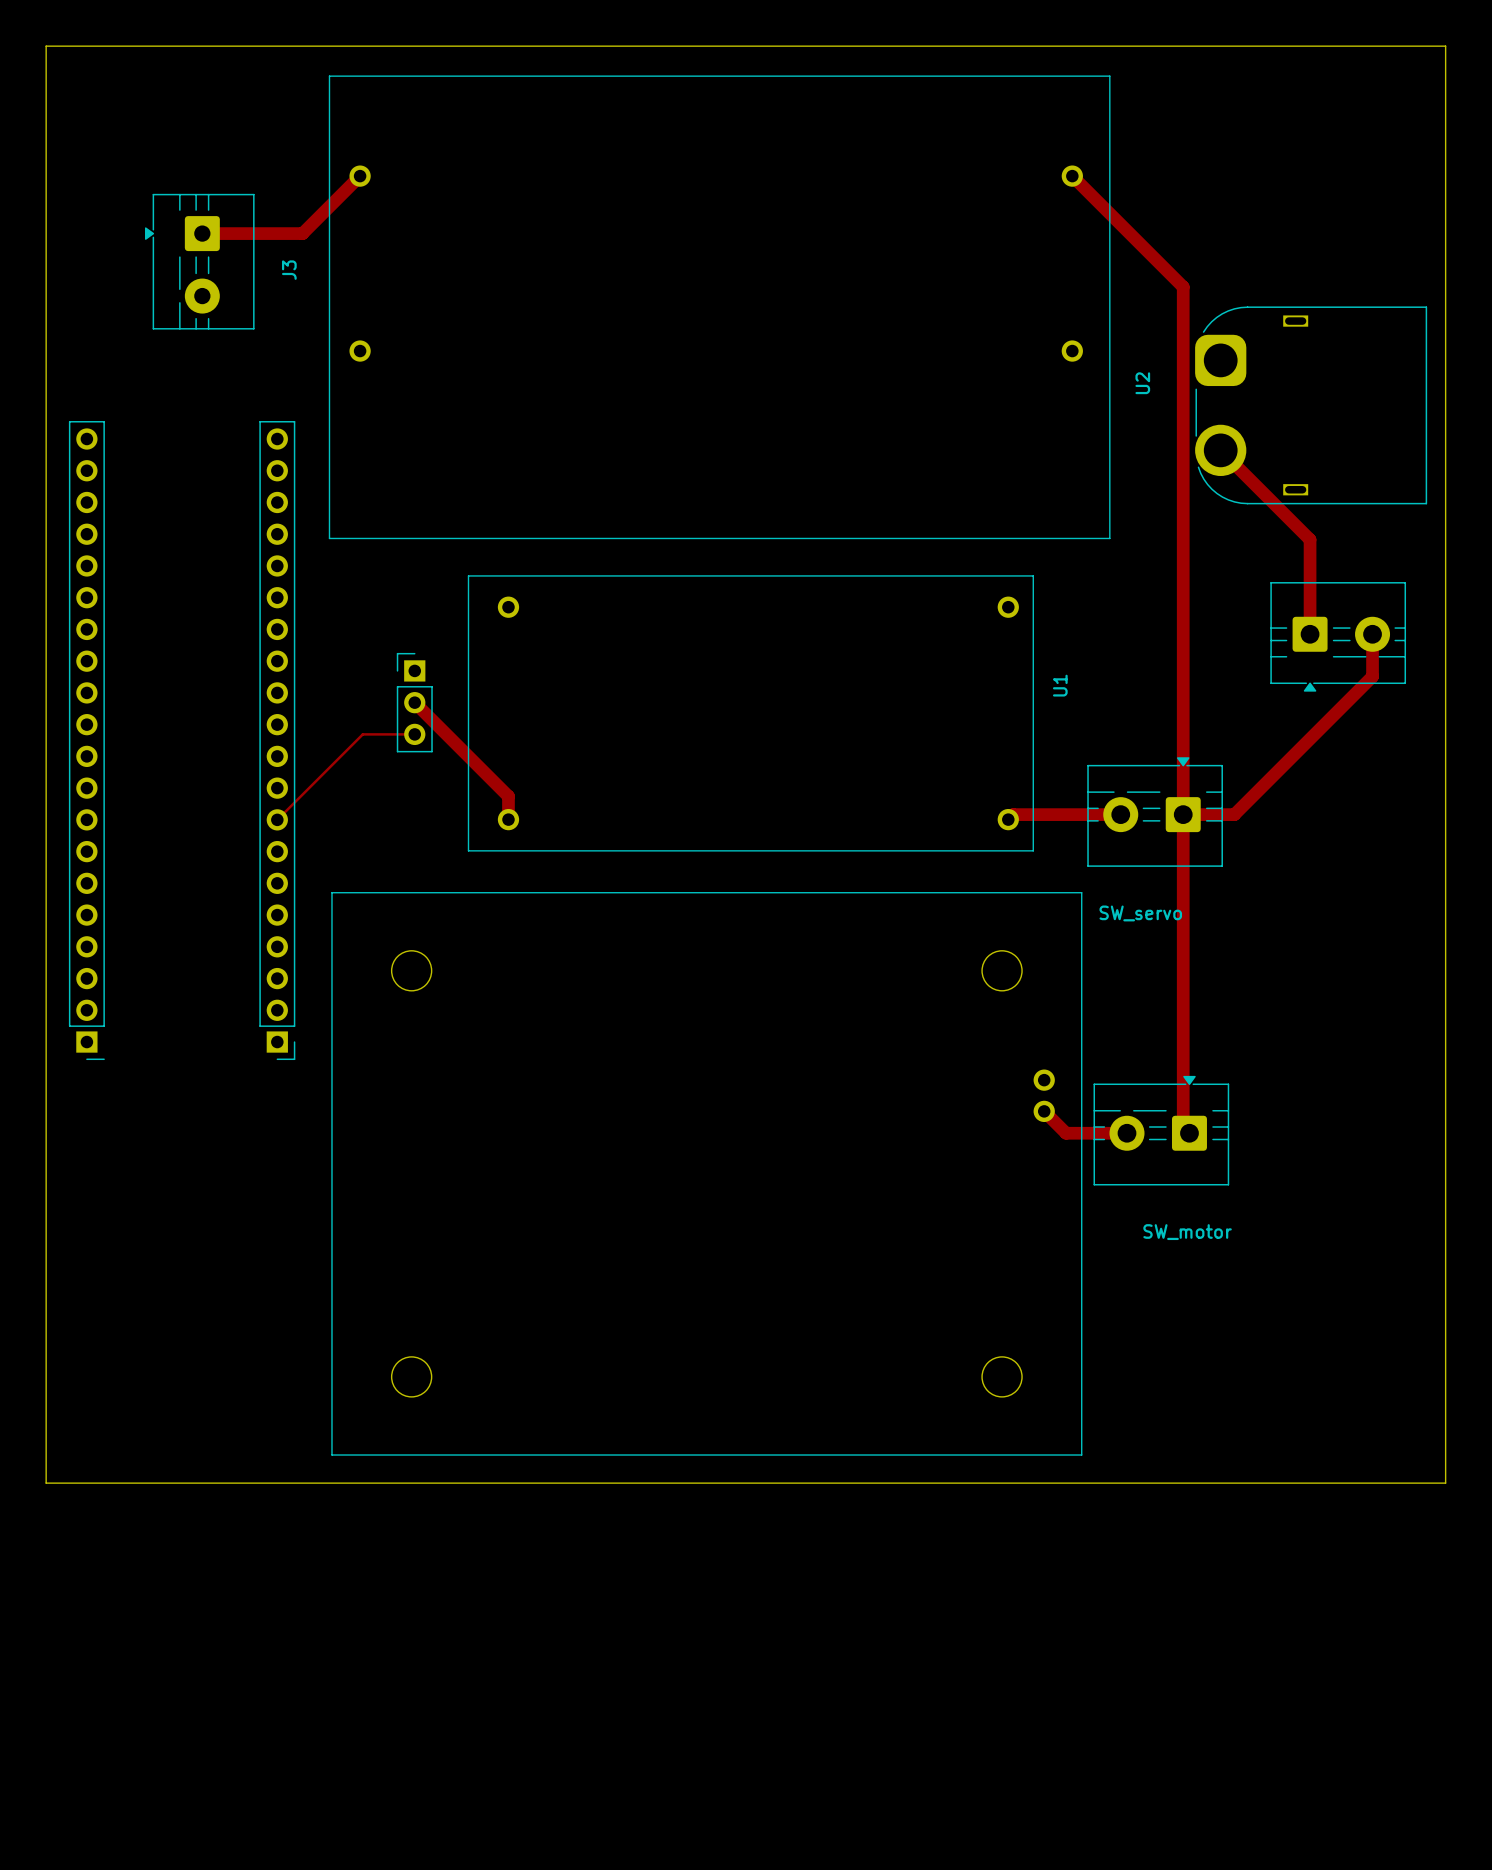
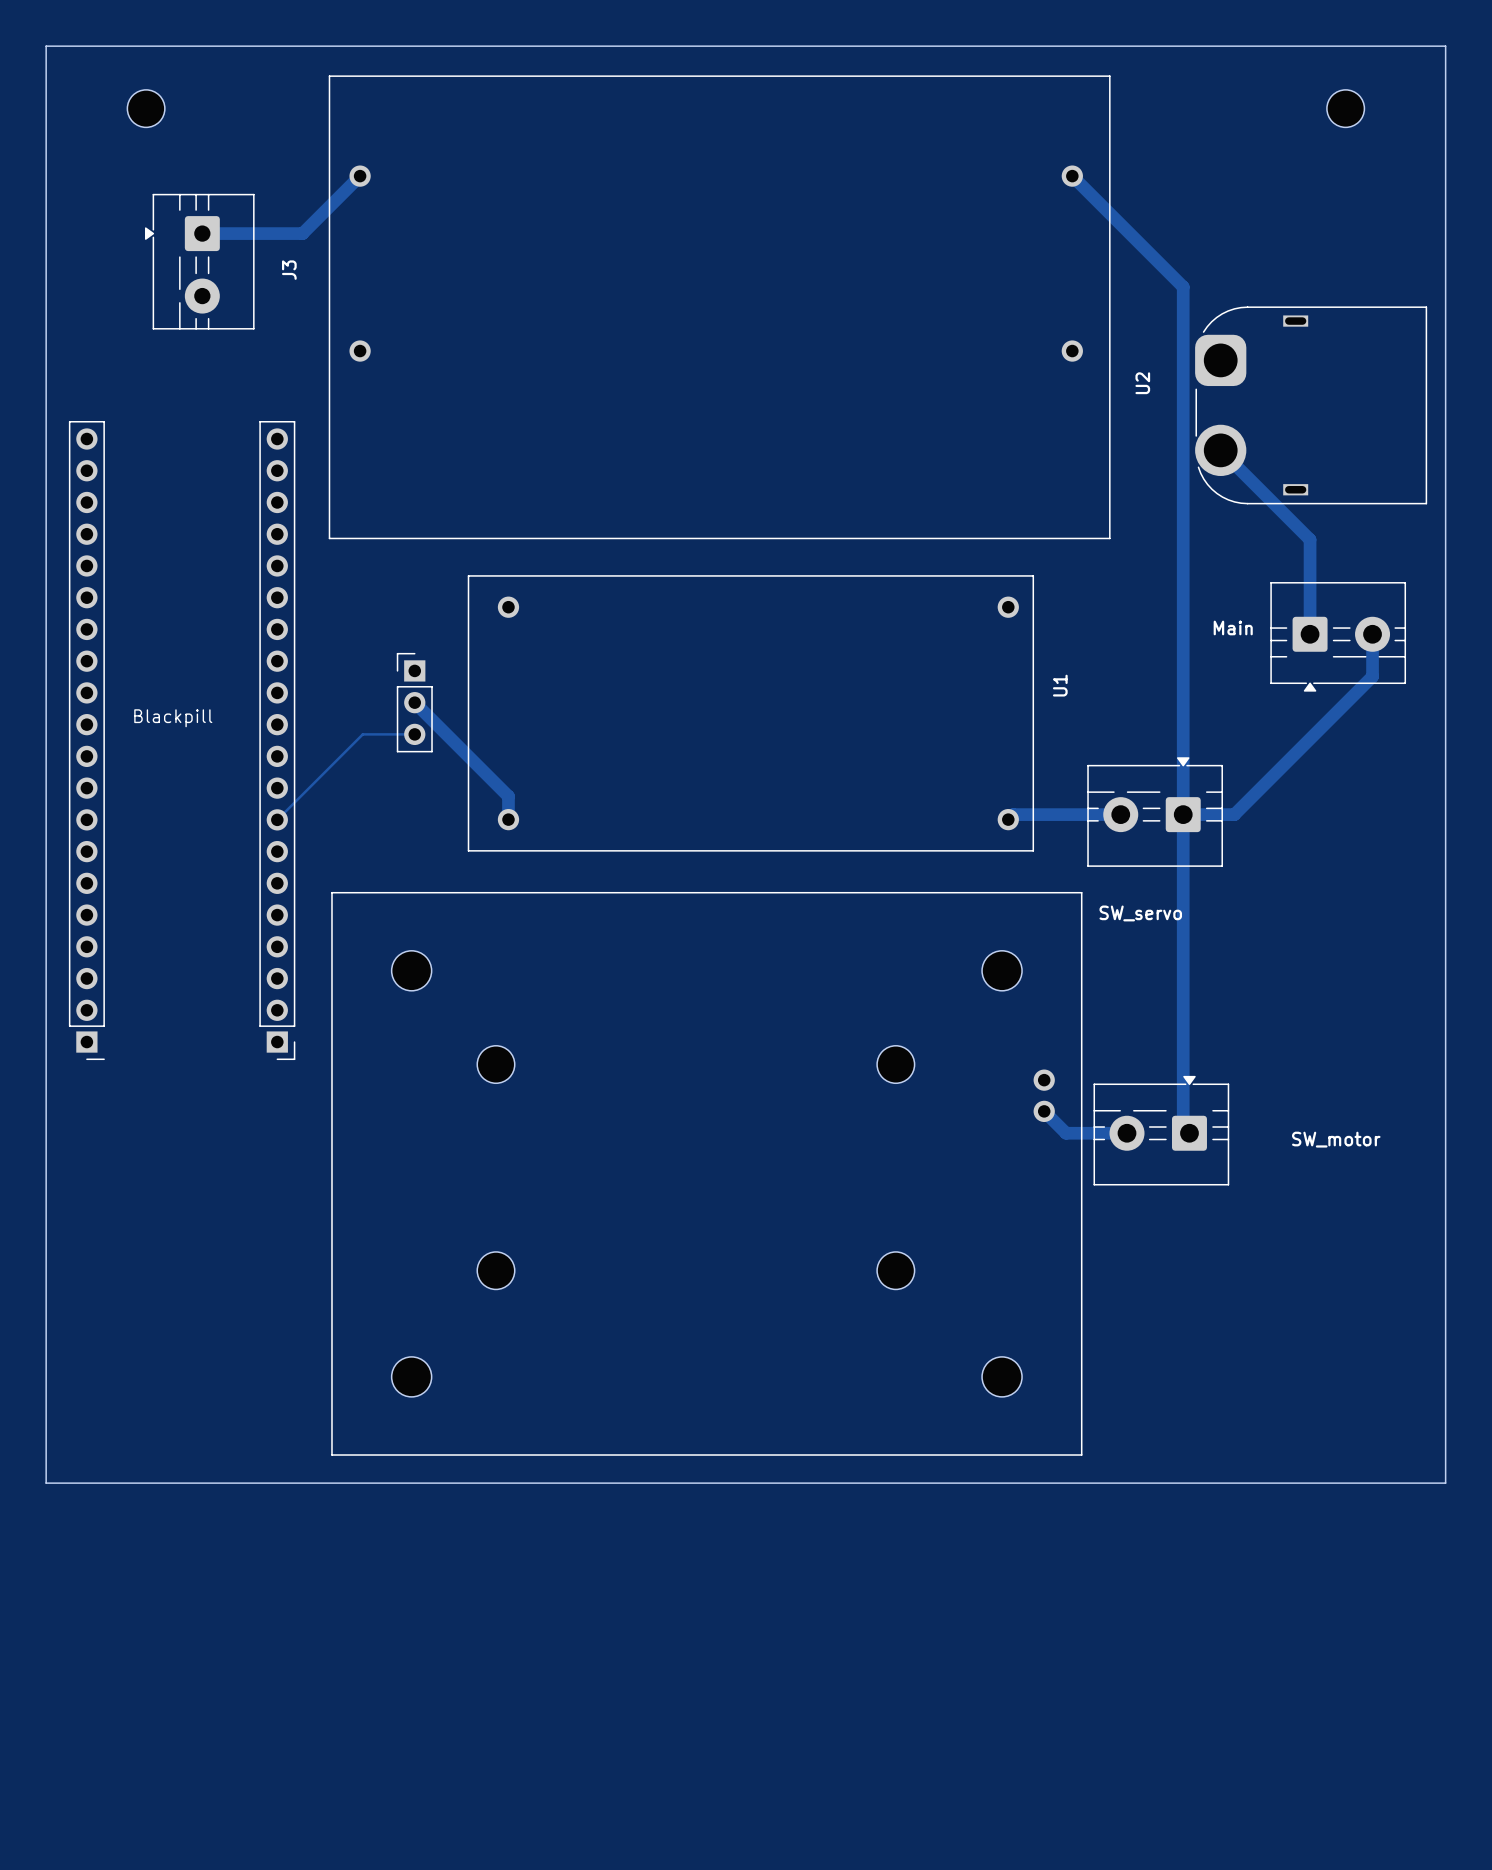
part: none -> (146, 108)
part: none -> (1345, 108)
part text: none -> Main (1233, 627)
text: none -> Blackpill (173, 718)
part: none -> (495, 1064)
part: none -> (895, 1064)
SW_motor name position: SW_motor (1187, 1232) -> SW_motor (1336, 1139)
part: none -> (495, 1270)
part: none -> (895, 1270)

